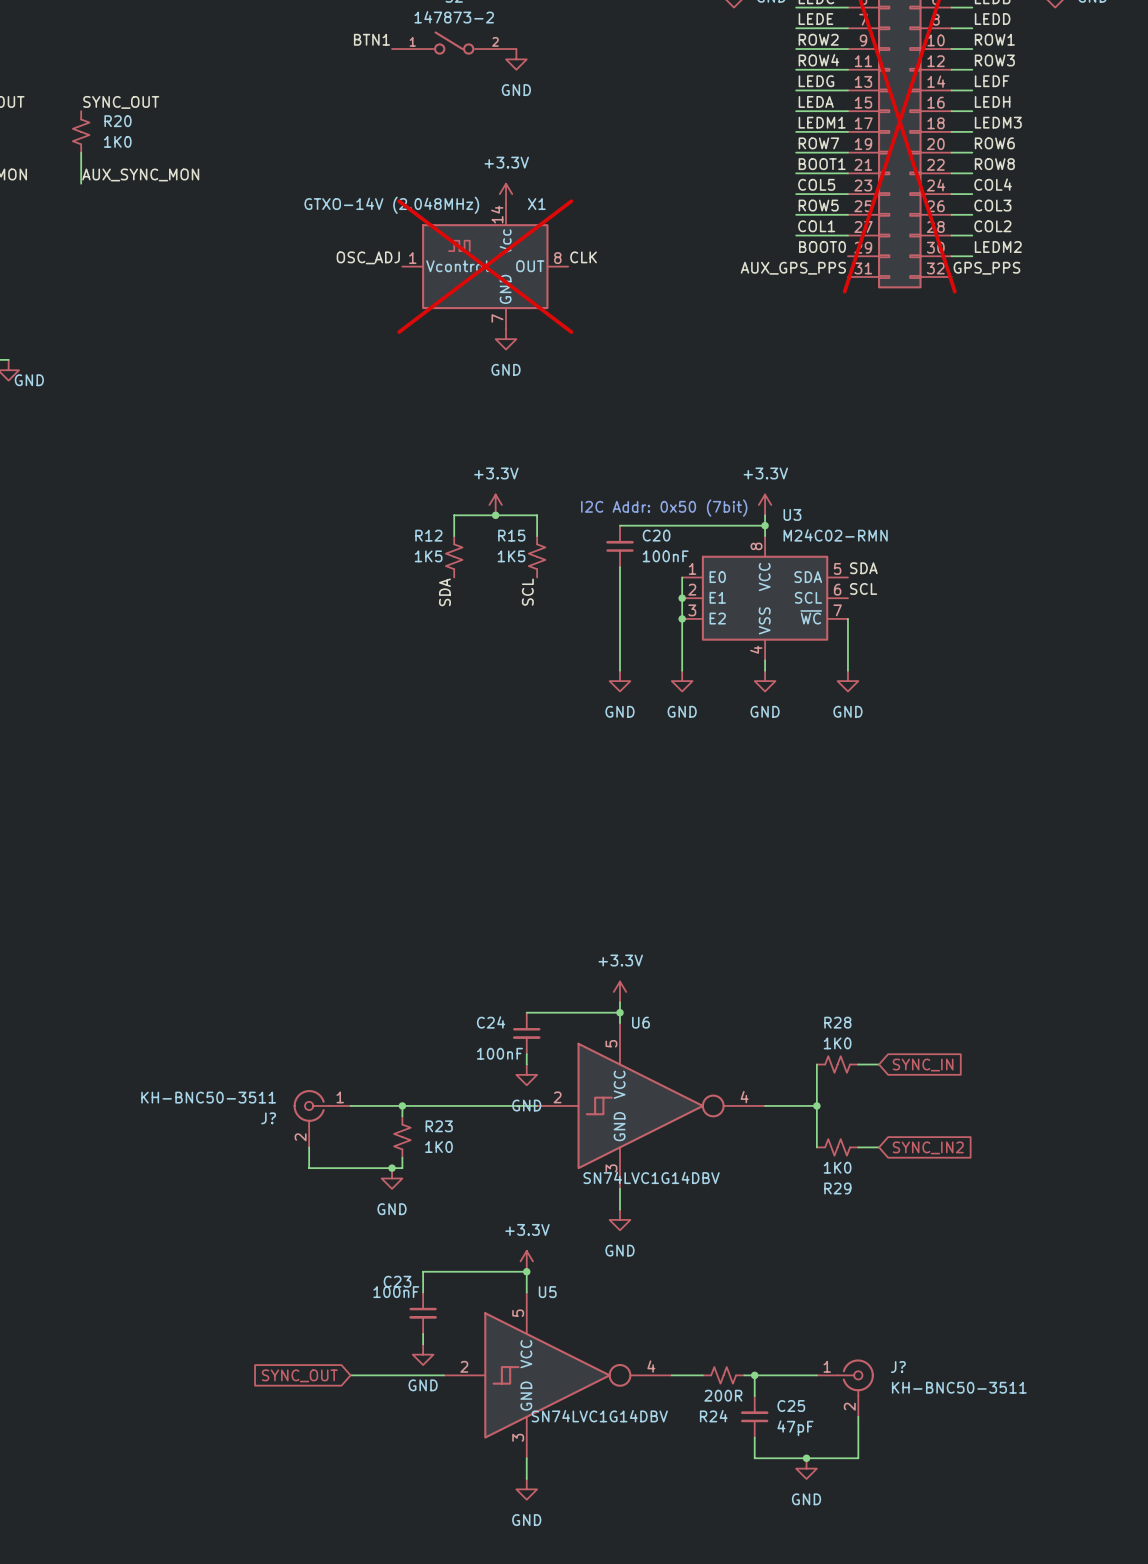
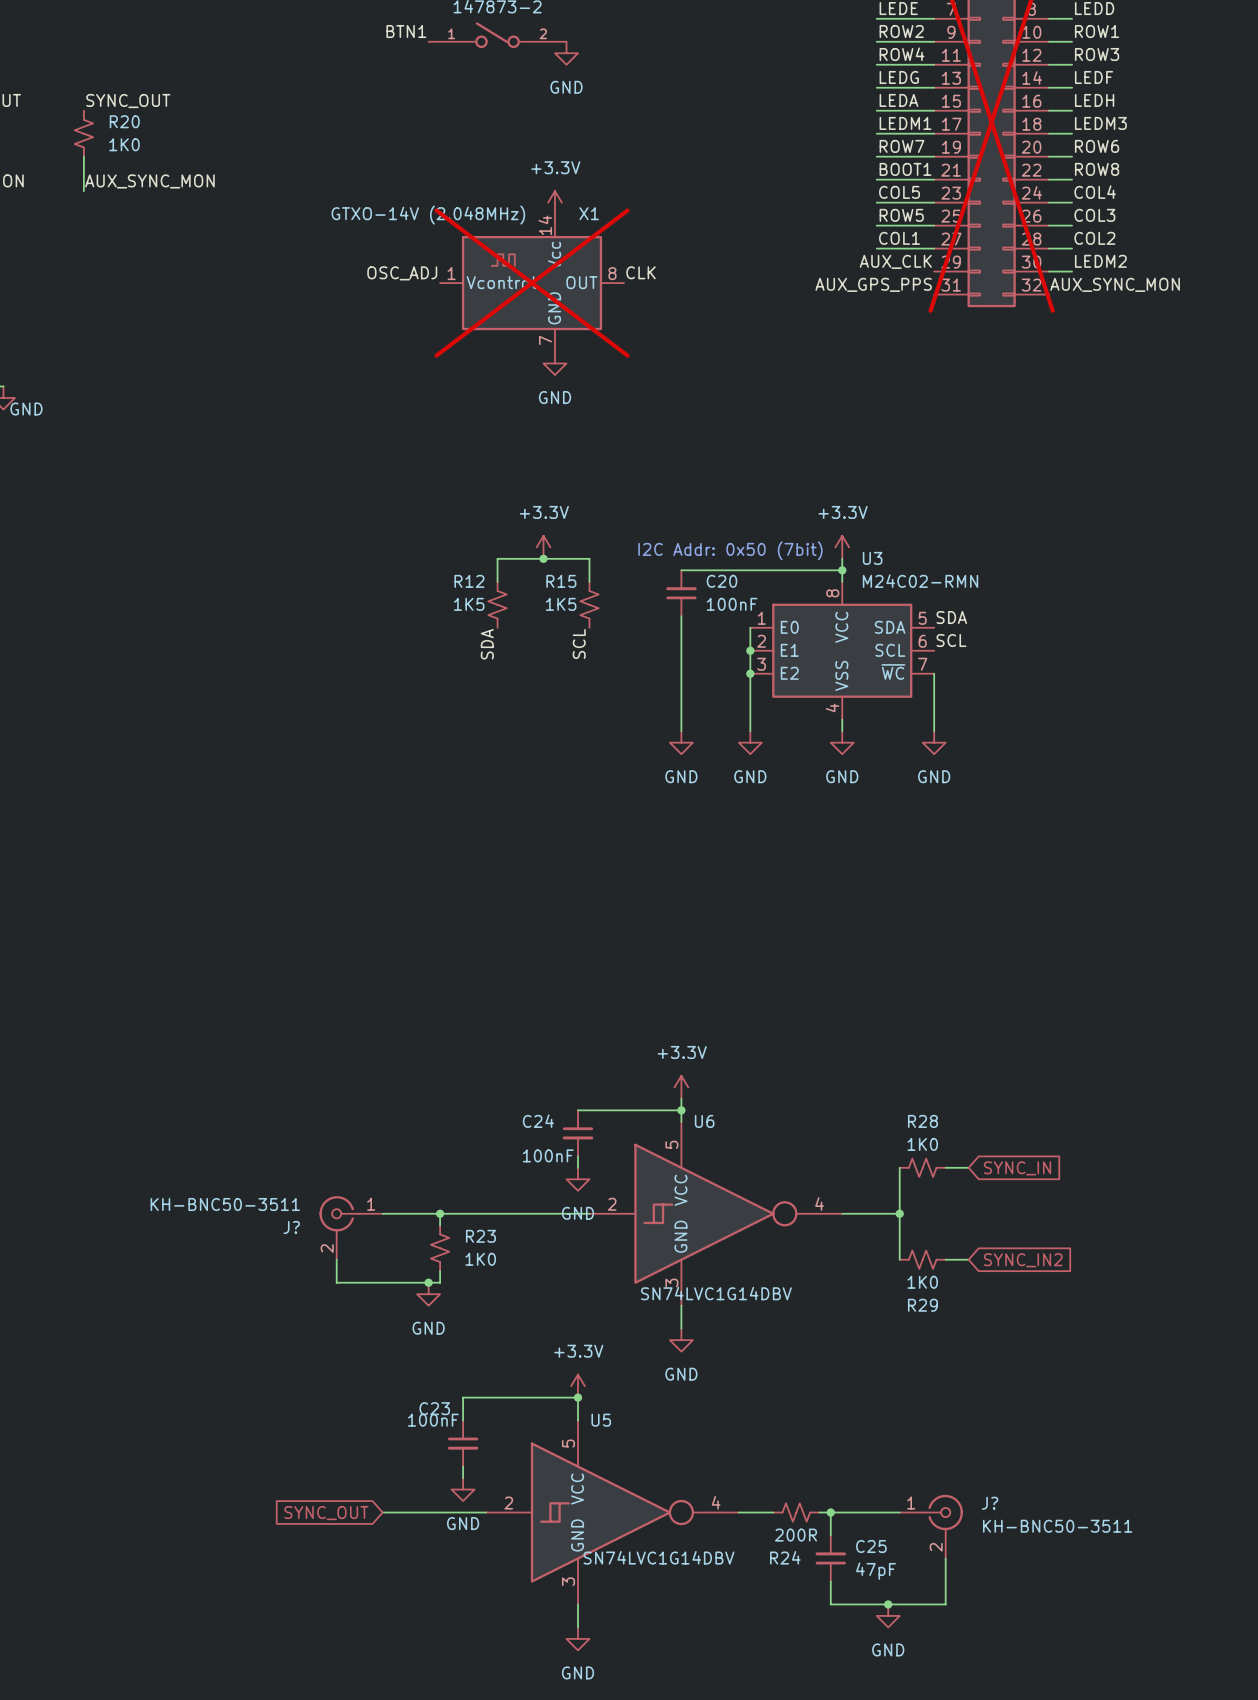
label: BOOT0 (822, 247) -> AUX_CLK (895, 261)
label: GPS_PPS (986, 268) -> AUX_SYNC_MON (1115, 284)

